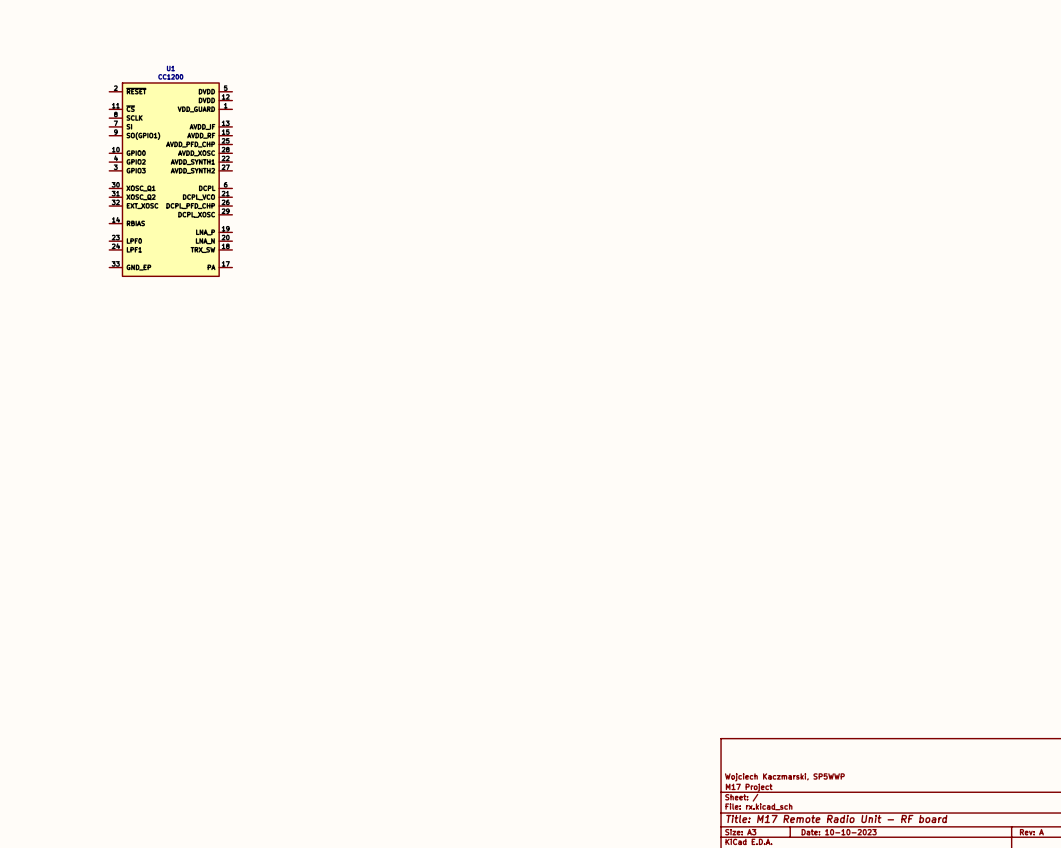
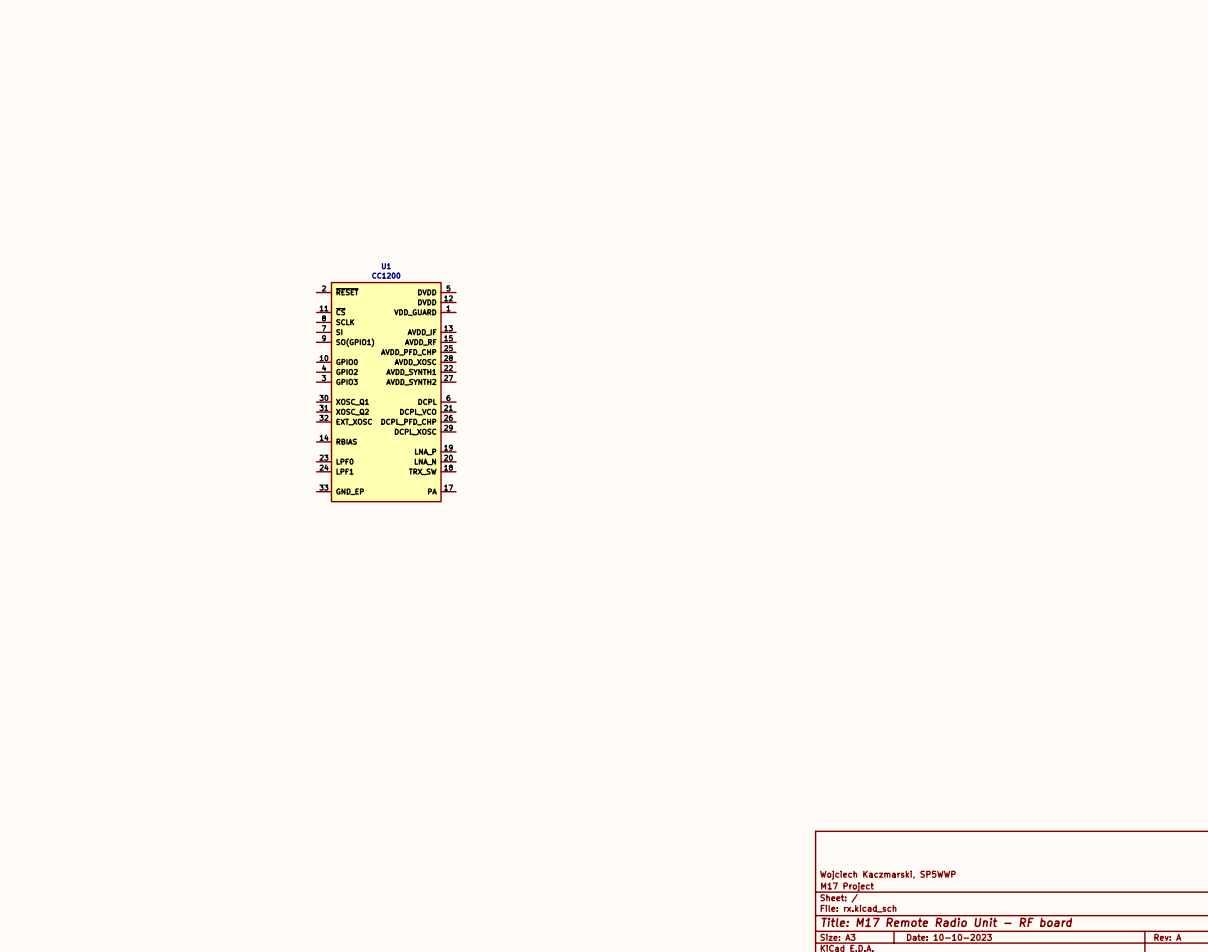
part position: (170, 179) -> (386, 392)

